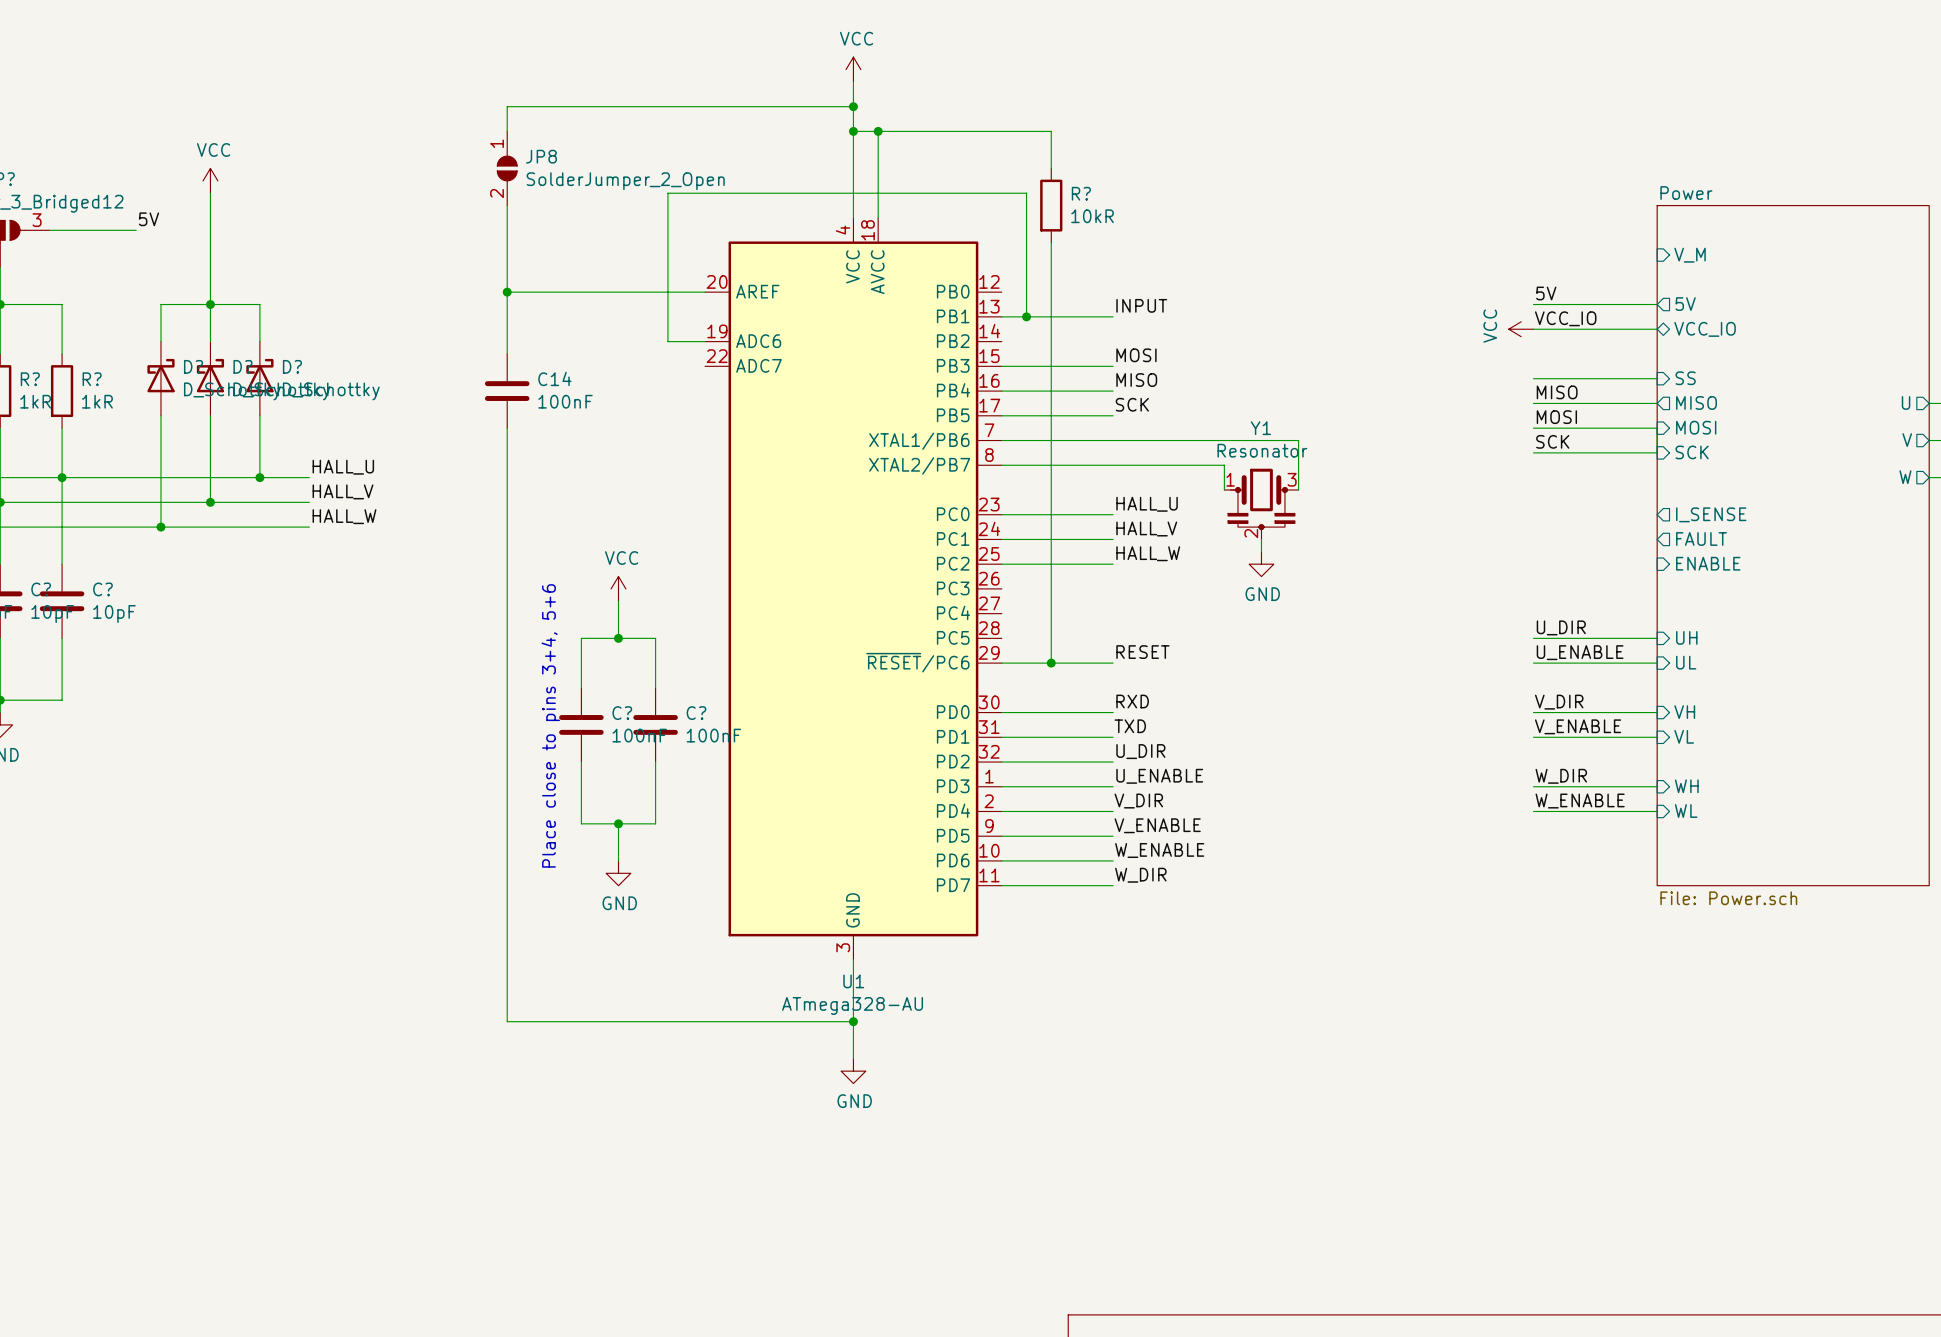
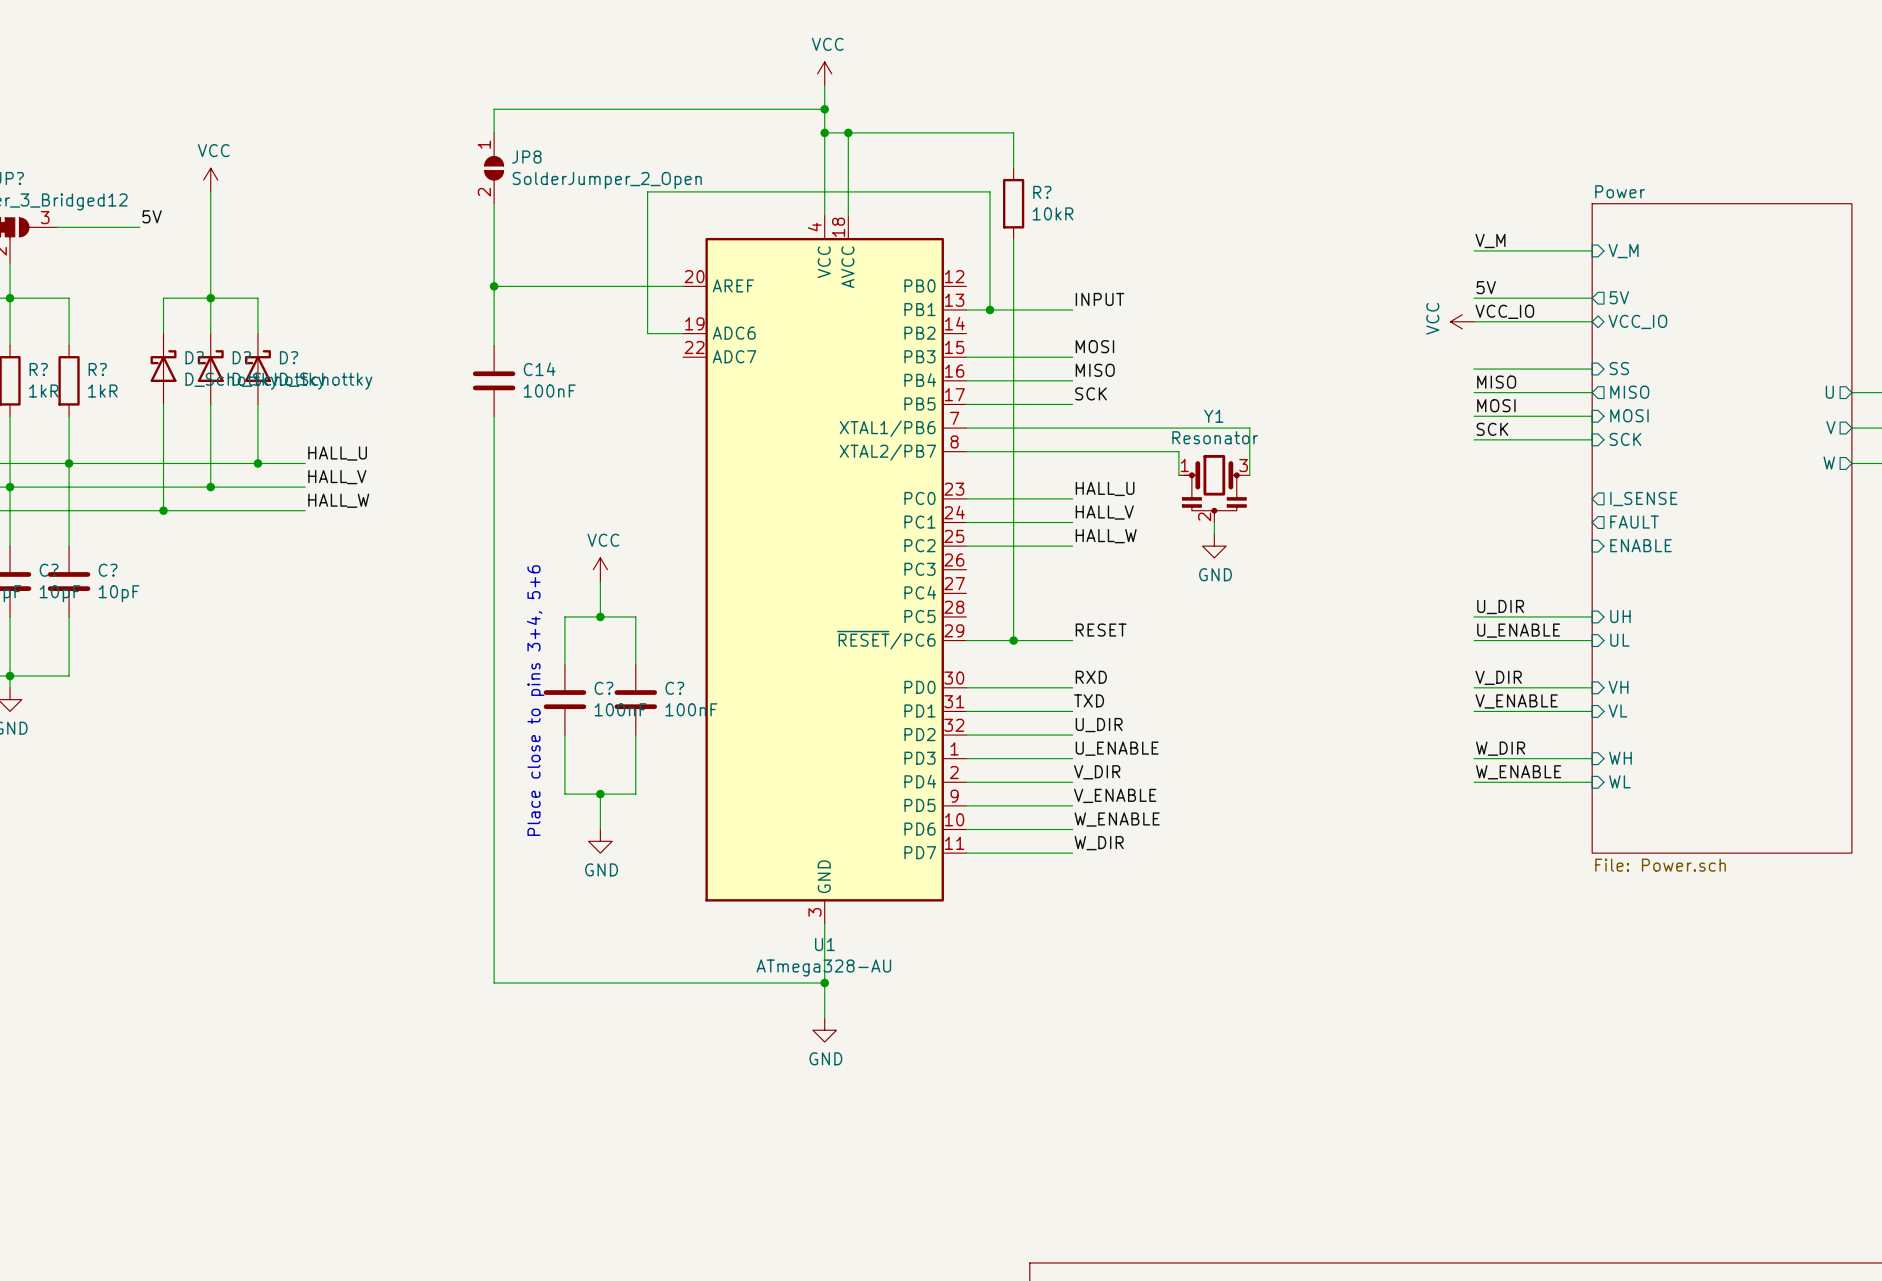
label: none -> V_M (1490, 240)
wire: none -> (1474, 250) (1592, 250)

